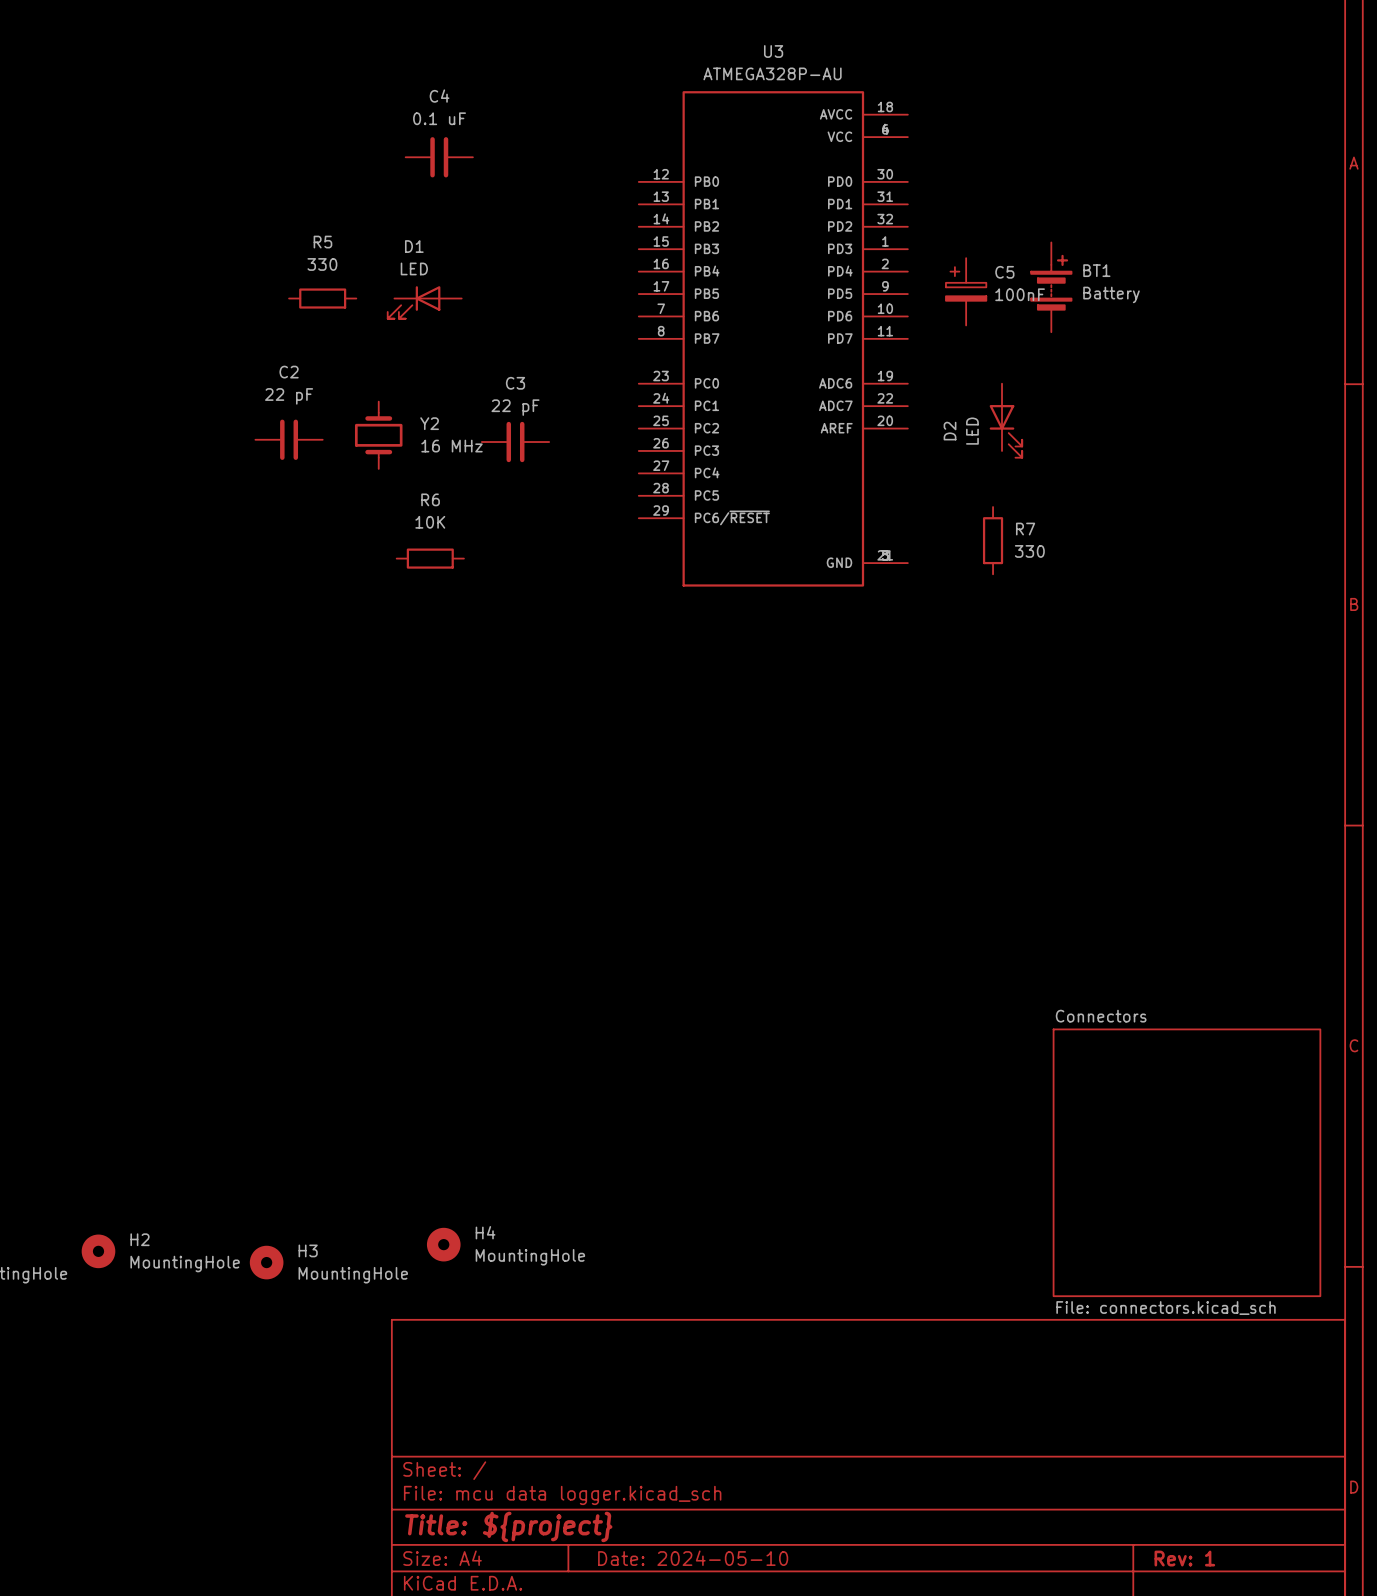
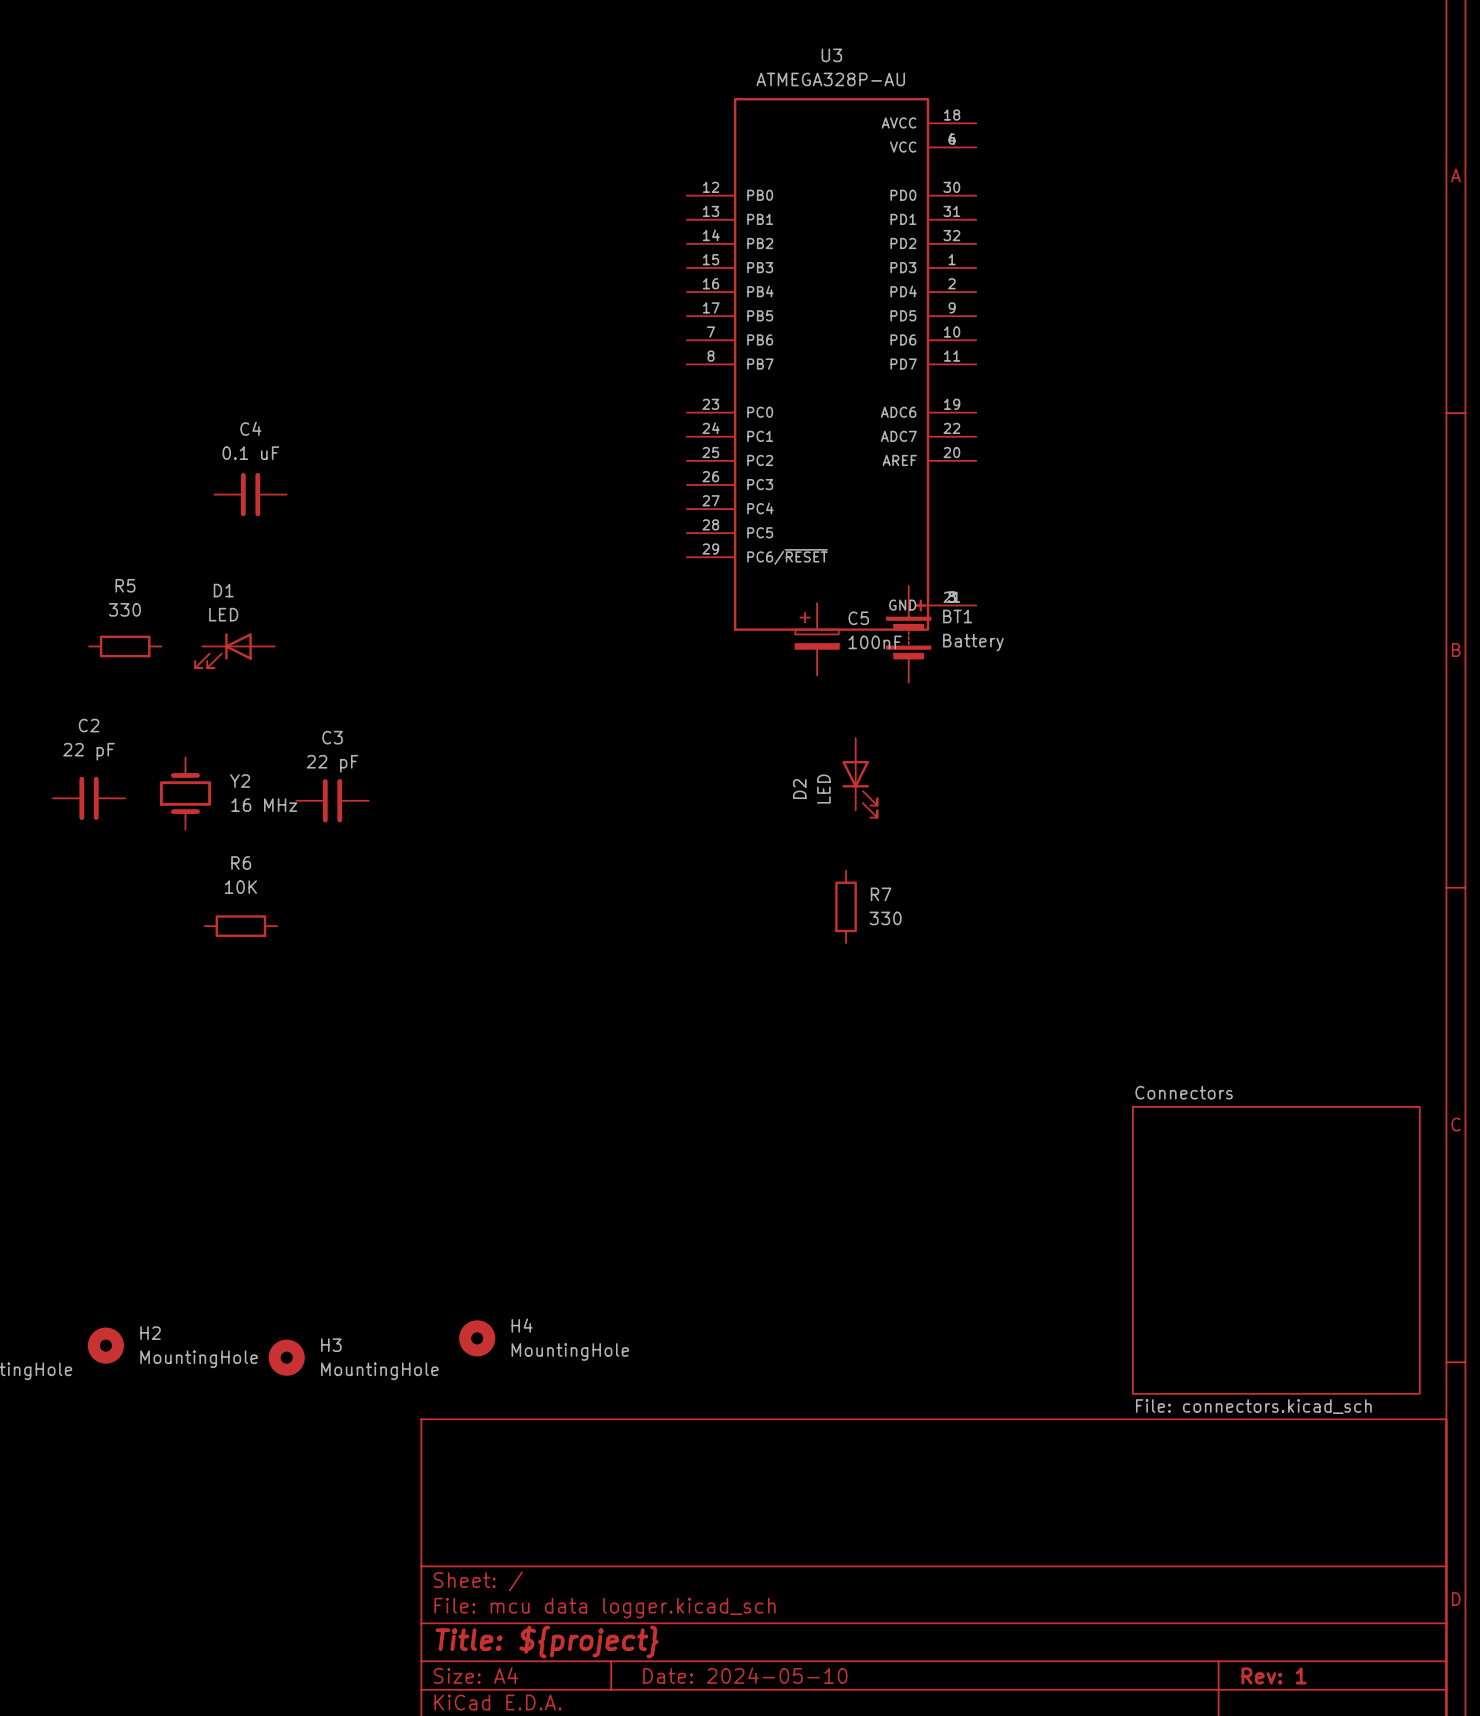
C4 position: (439, 157) -> (250, 494)
BT1 position: (1051, 287) -> (908, 634)
C5 position: (966, 291) -> (817, 639)
R5 position: (322, 298) -> (125, 646)
D1 position: (424, 302) -> (234, 650)
D2 position: (1005, 420) -> (859, 777)
Y2 position: (378, 435) -> (185, 793)
C2 position: (289, 439) -> (89, 798)
C3 position: (515, 442) -> (332, 800)
R7 position: (993, 540) -> (846, 906)
R6 position: (430, 558) -> (240, 926)

